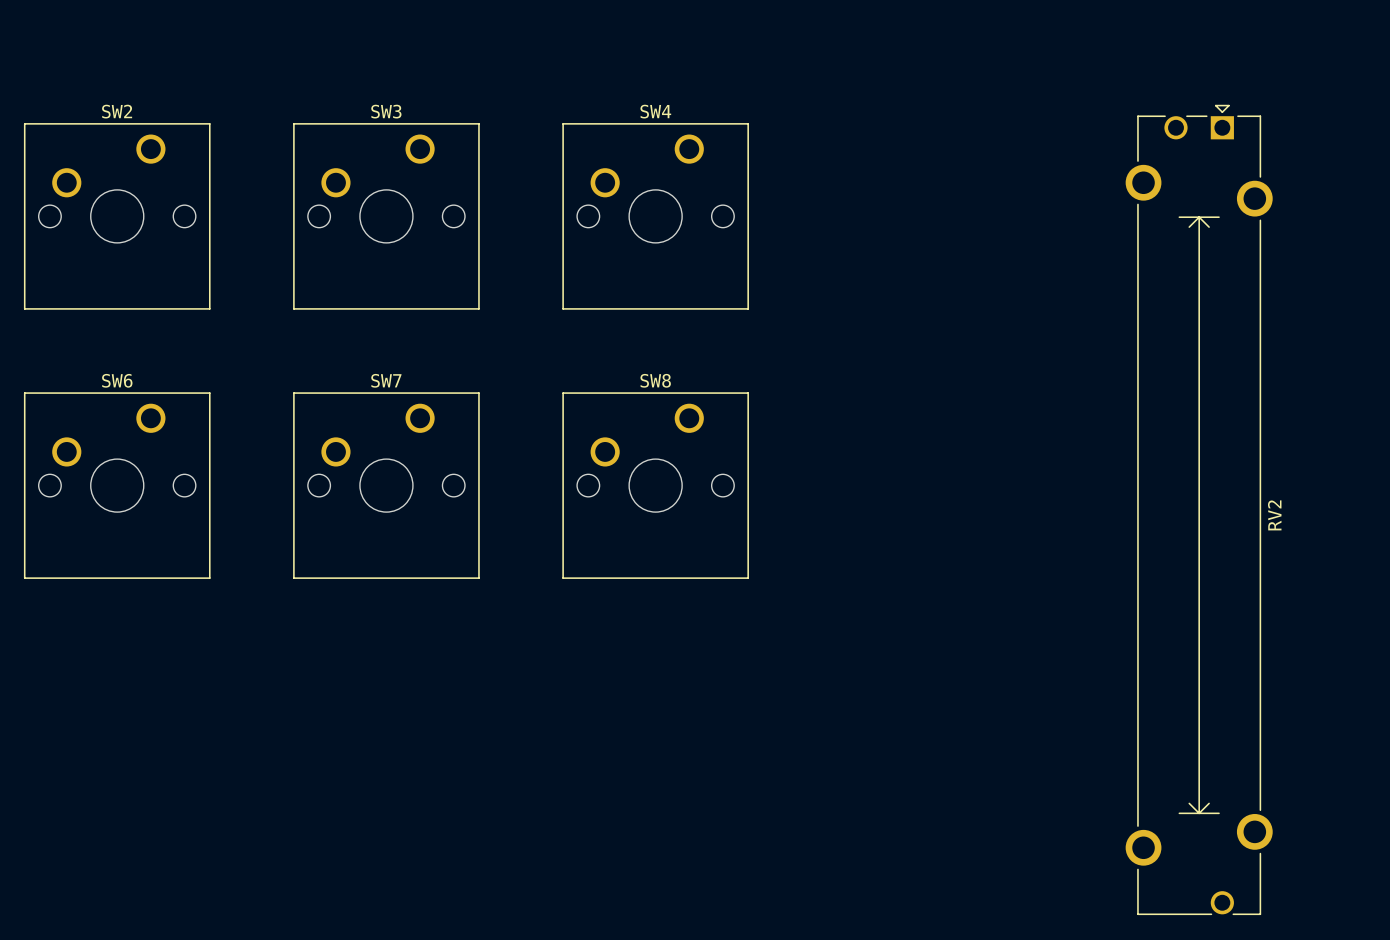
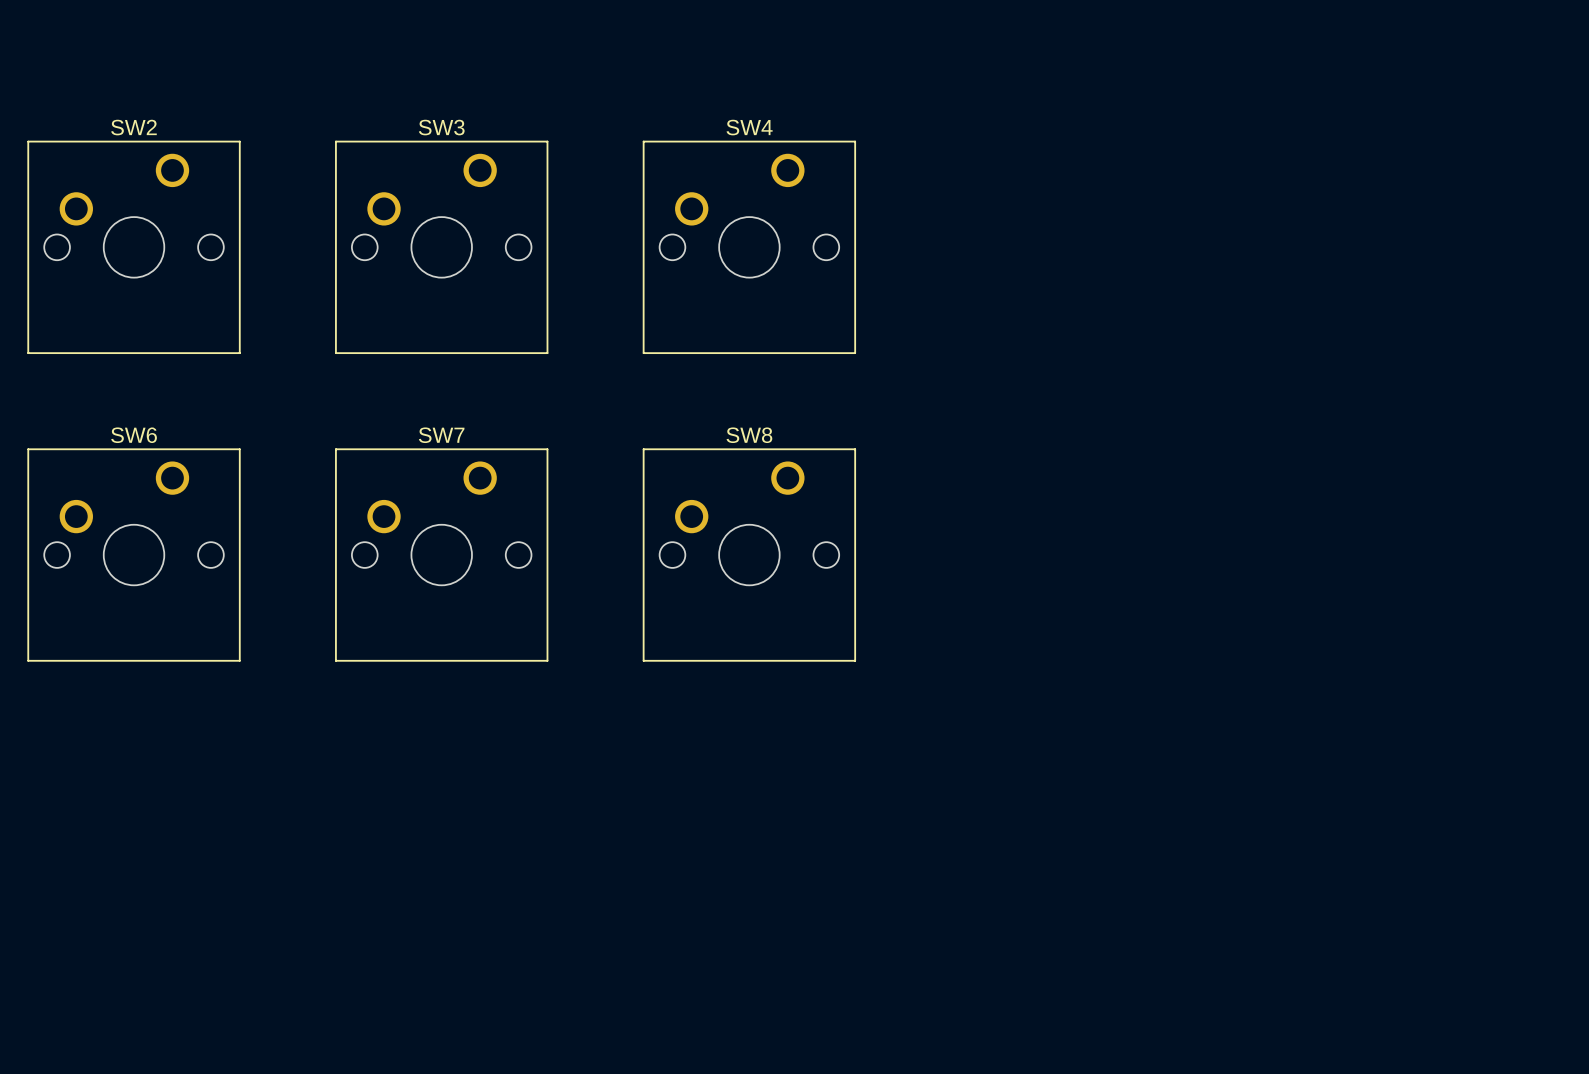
RV2: (1199, 509) -> none

